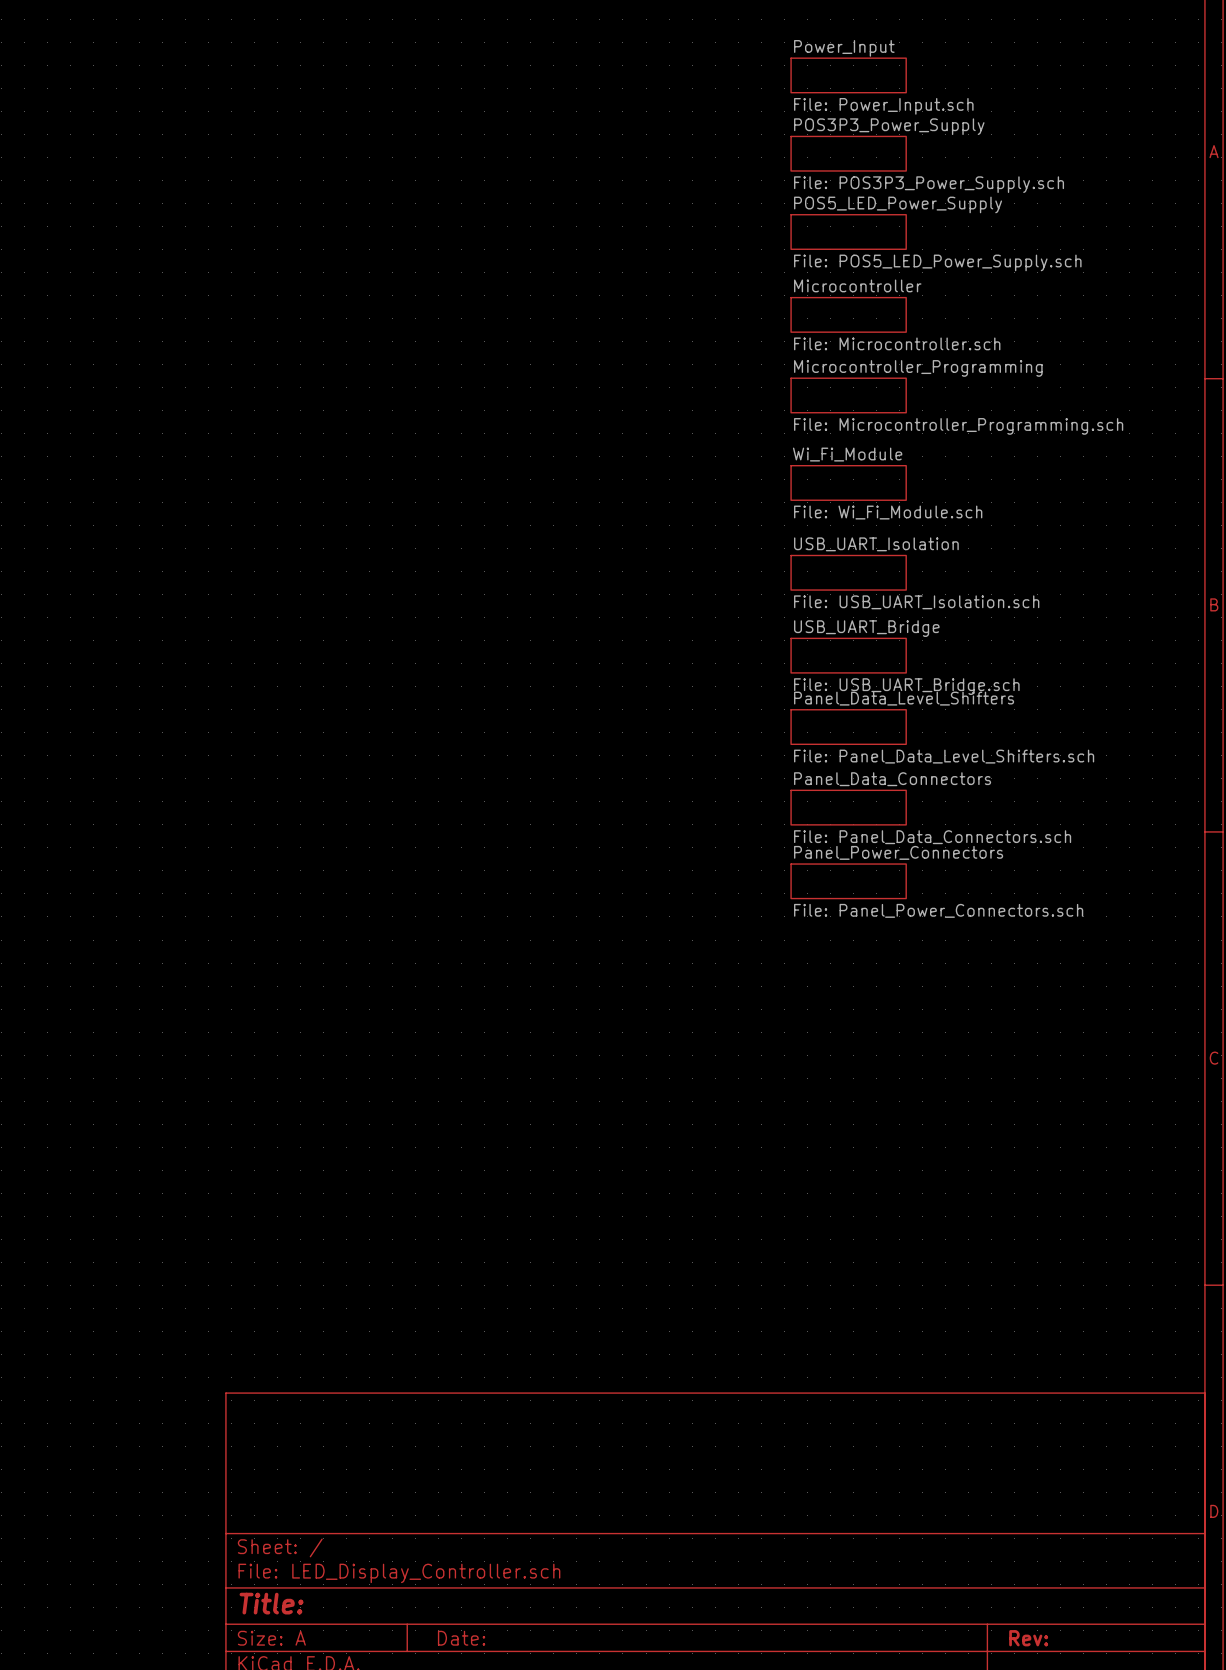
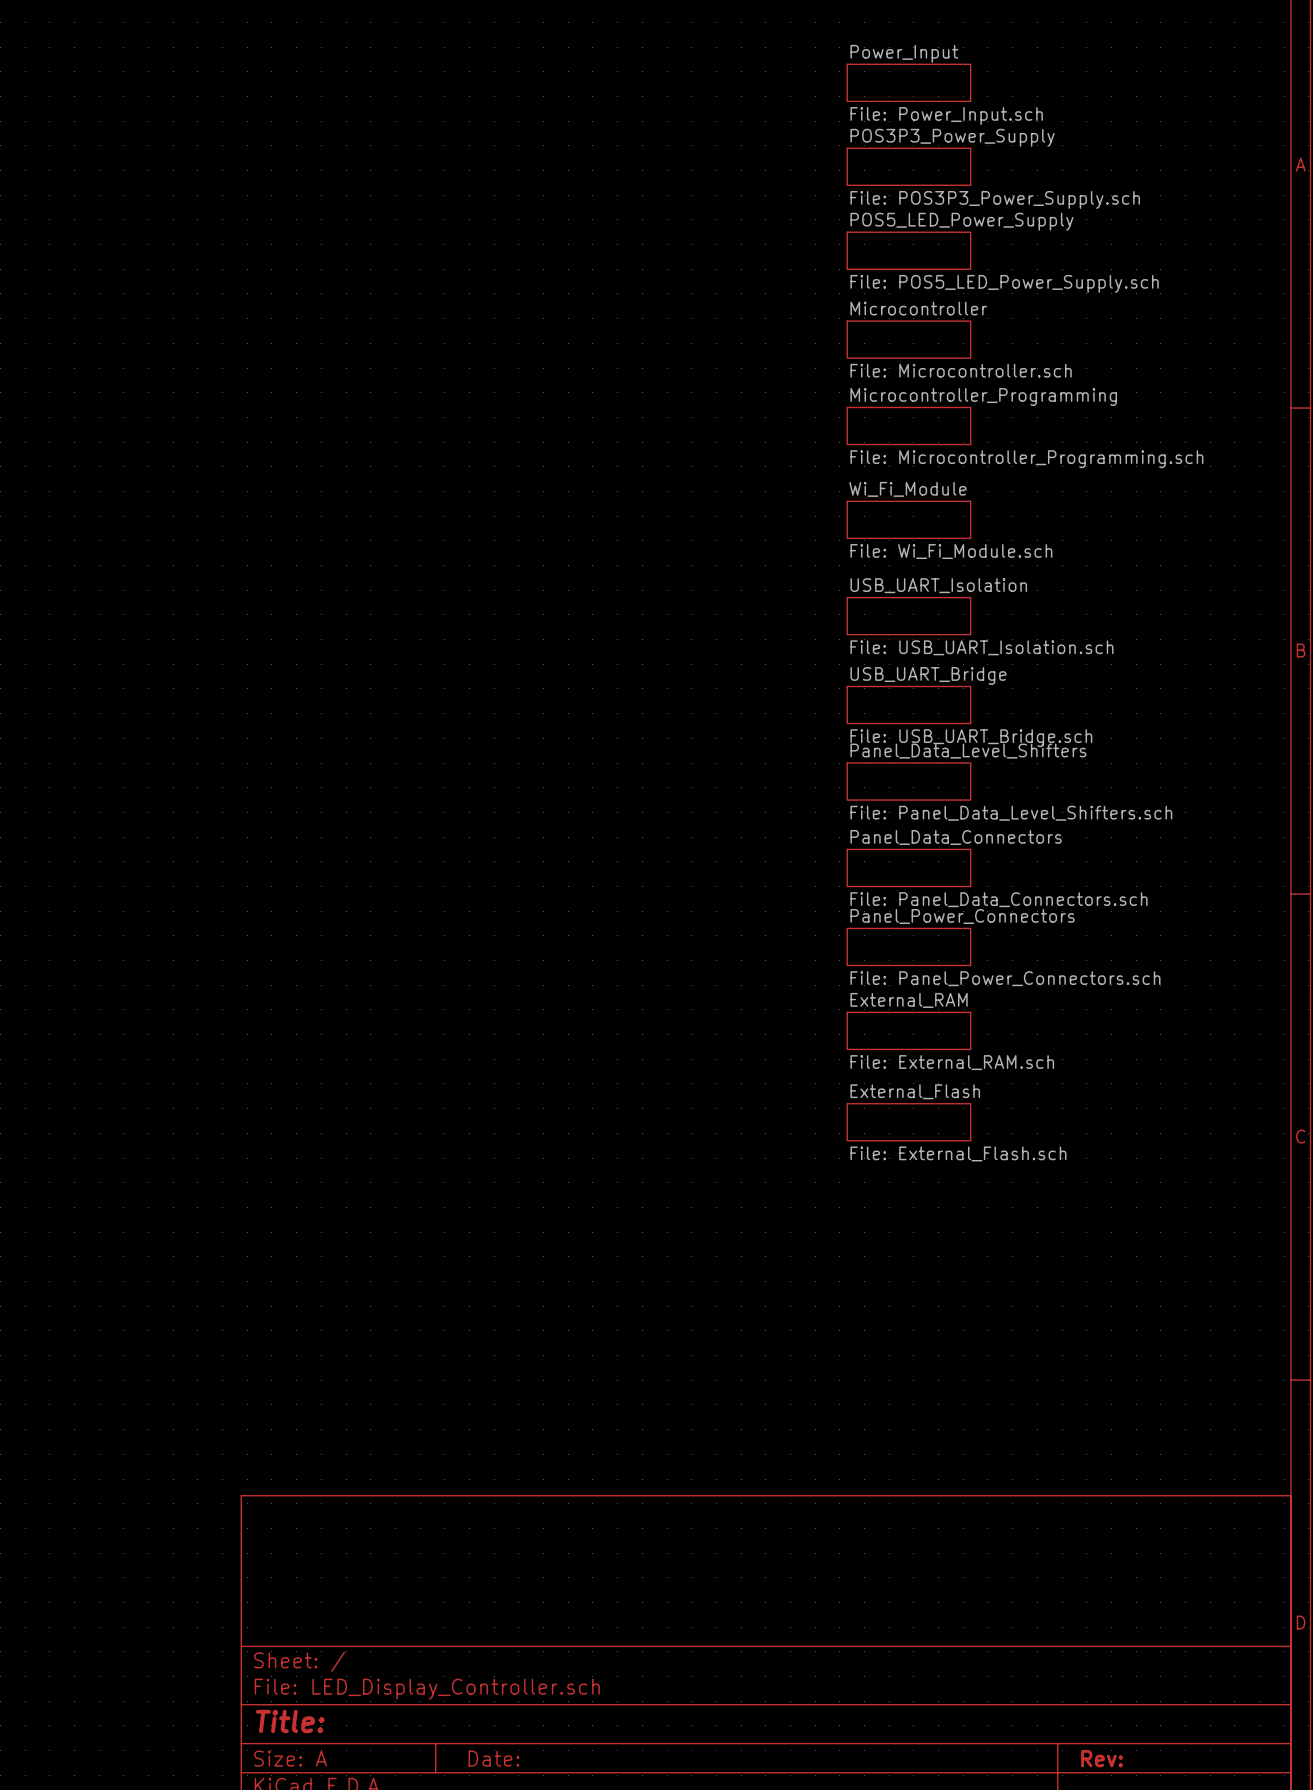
sheet External_RAM: none -> File: External_RAM.sch (908, 1030)
sheet External_Flash: none -> File: External_Flash.sch (908, 1122)

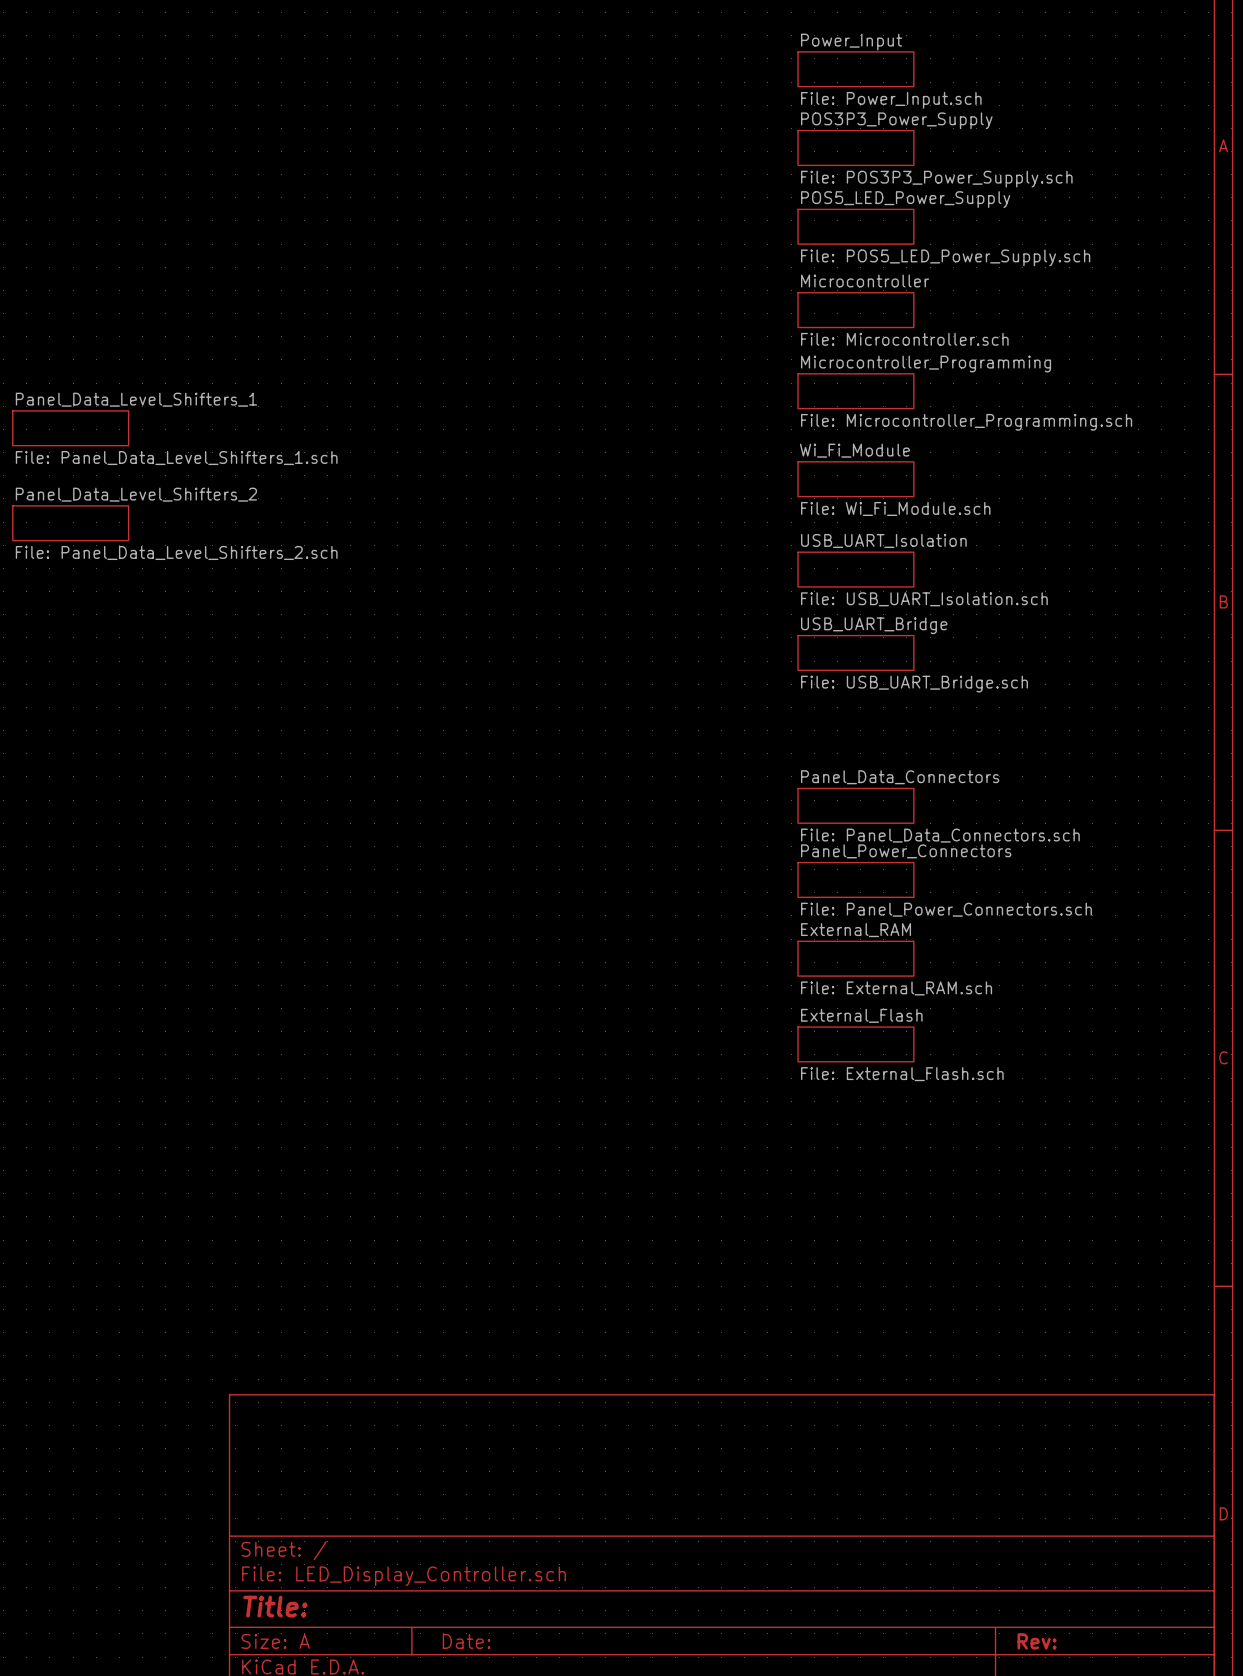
sheet Panel_Data_Level_Shifters_1: none -> File: Panel_Data_Level_Shifters_1.sch (70, 428)
sheet Panel_Data_Level_Shifters_2: none -> File: Panel_Data_Level_Shifters_2.sch (70, 523)
sheet Panel_Data_Level_Shifters: File: Panel_Data_Level_Shifters.sch (908, 781) -> none

